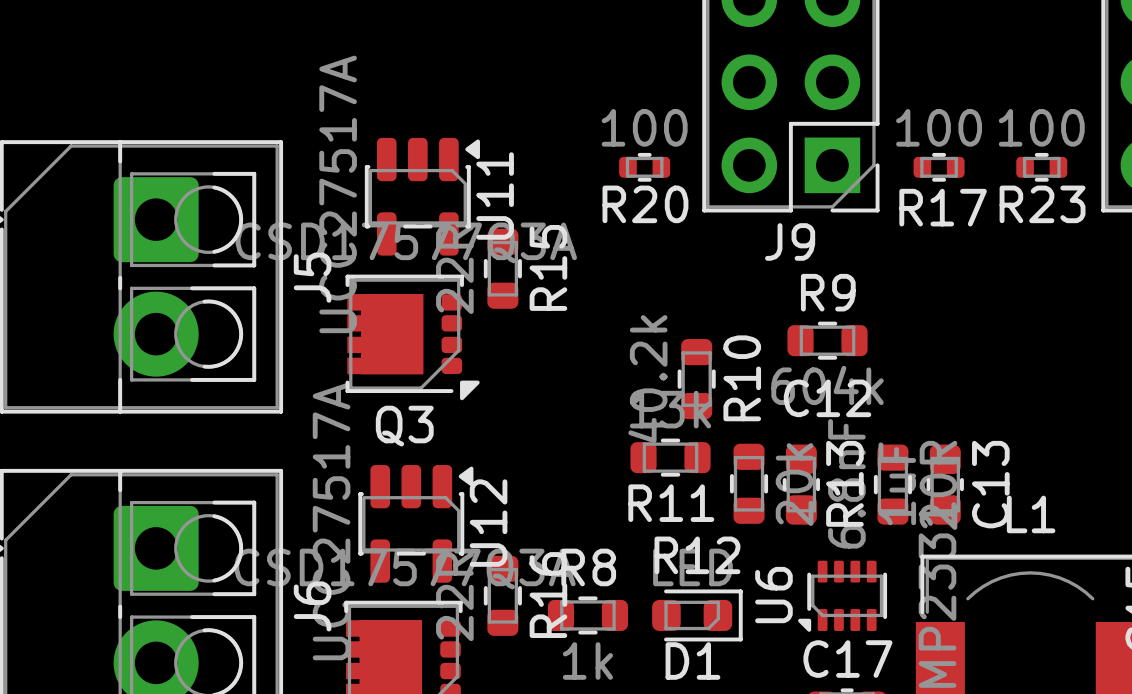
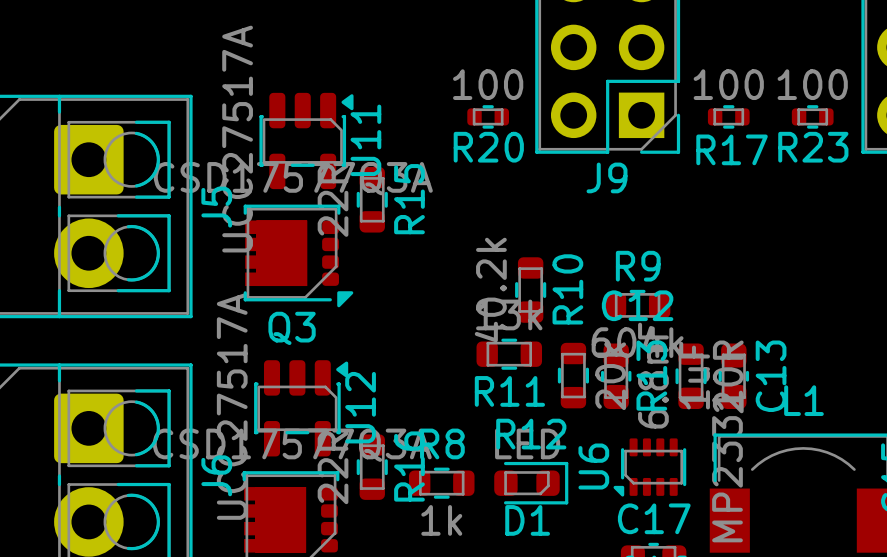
R9 position: (827, 340) -> (637, 305)

